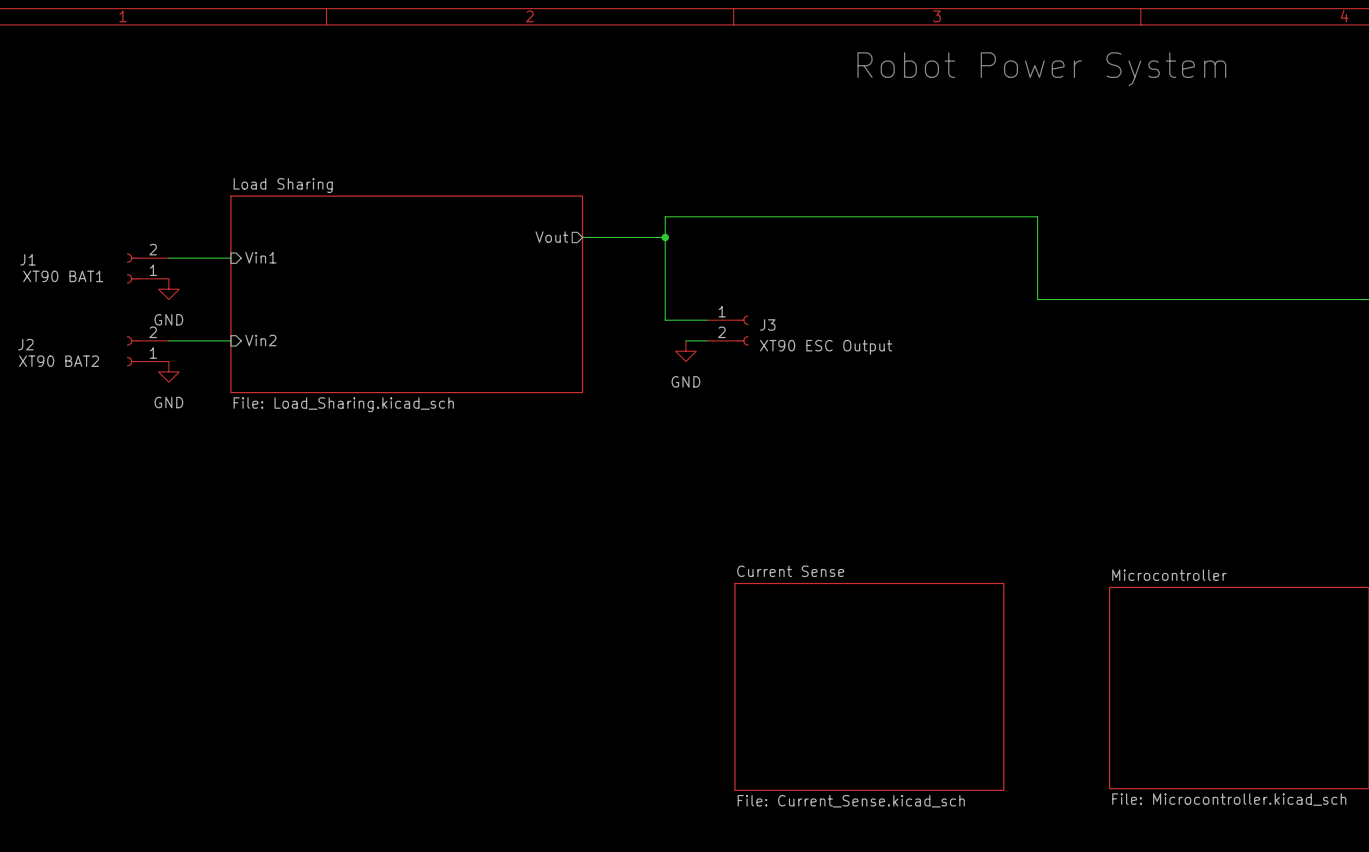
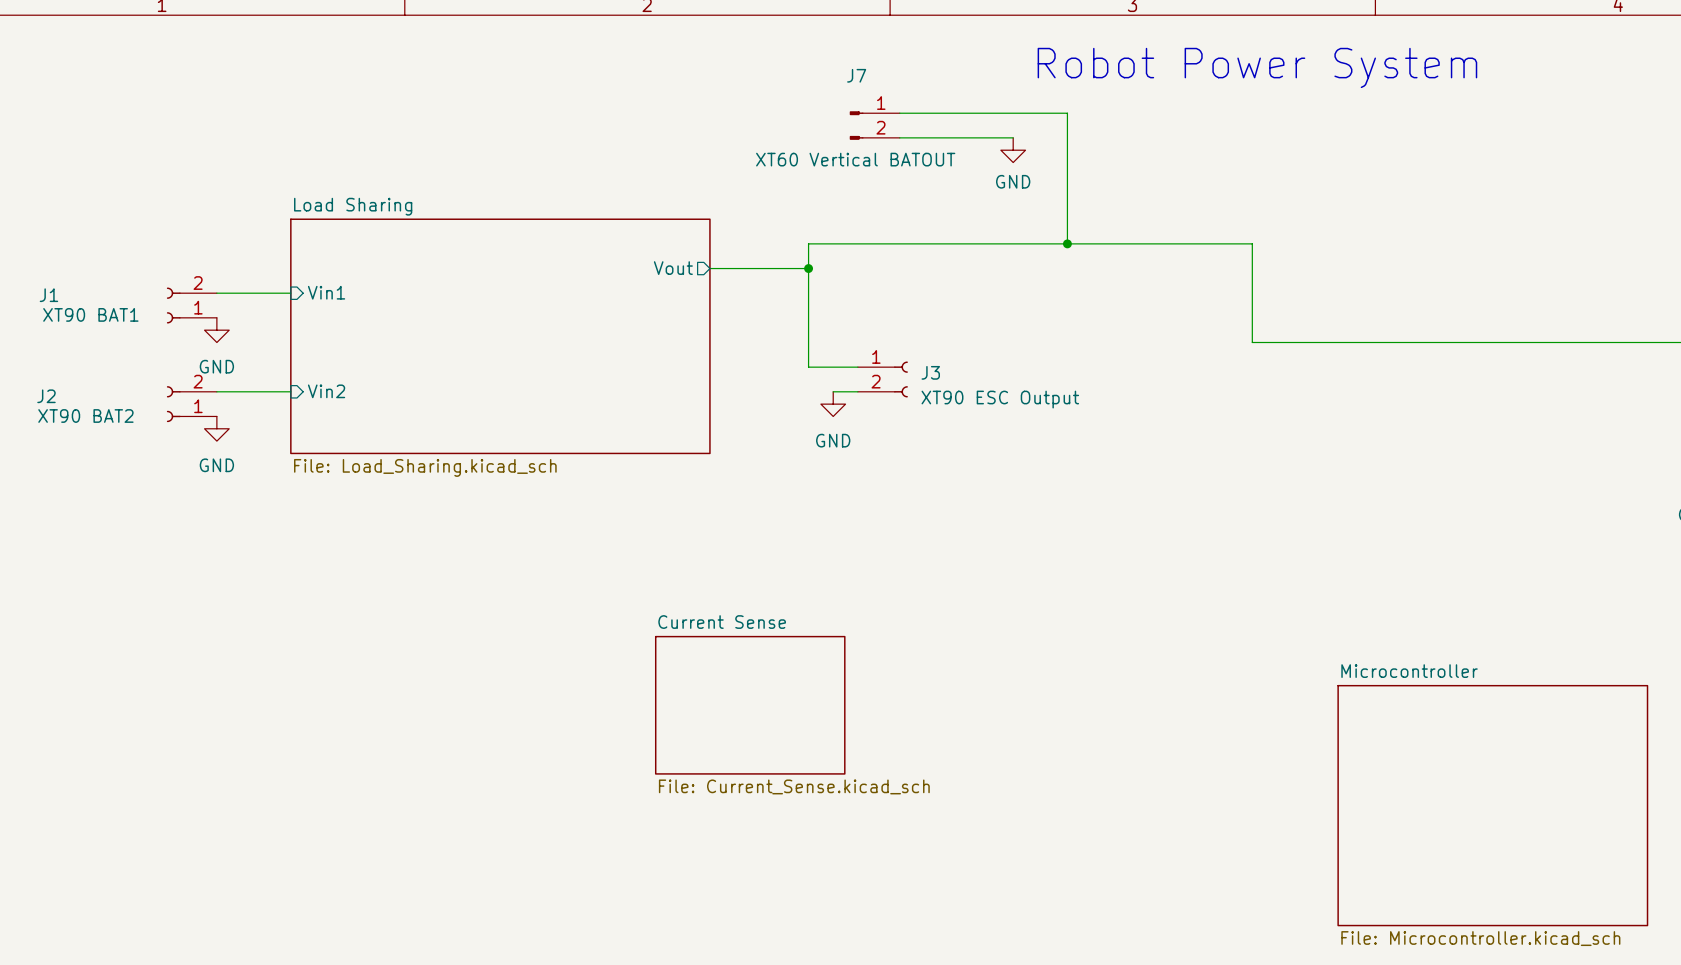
wire: none -> (899, 113) (1067, 113) (1067, 243)
J7: none -> XT60 Vertical BATOUT (874, 125)
wire: none -> (899, 137) (1013, 137)
power symbol: none -> GND (1013, 150)
junction: none -> (1067, 243)
sheet Current Sense: none -> File: Current_Sense.kicad_sch (750, 705)
sheet Current Sense: File: Current_Sense.kicad_sch (869, 686) -> none

